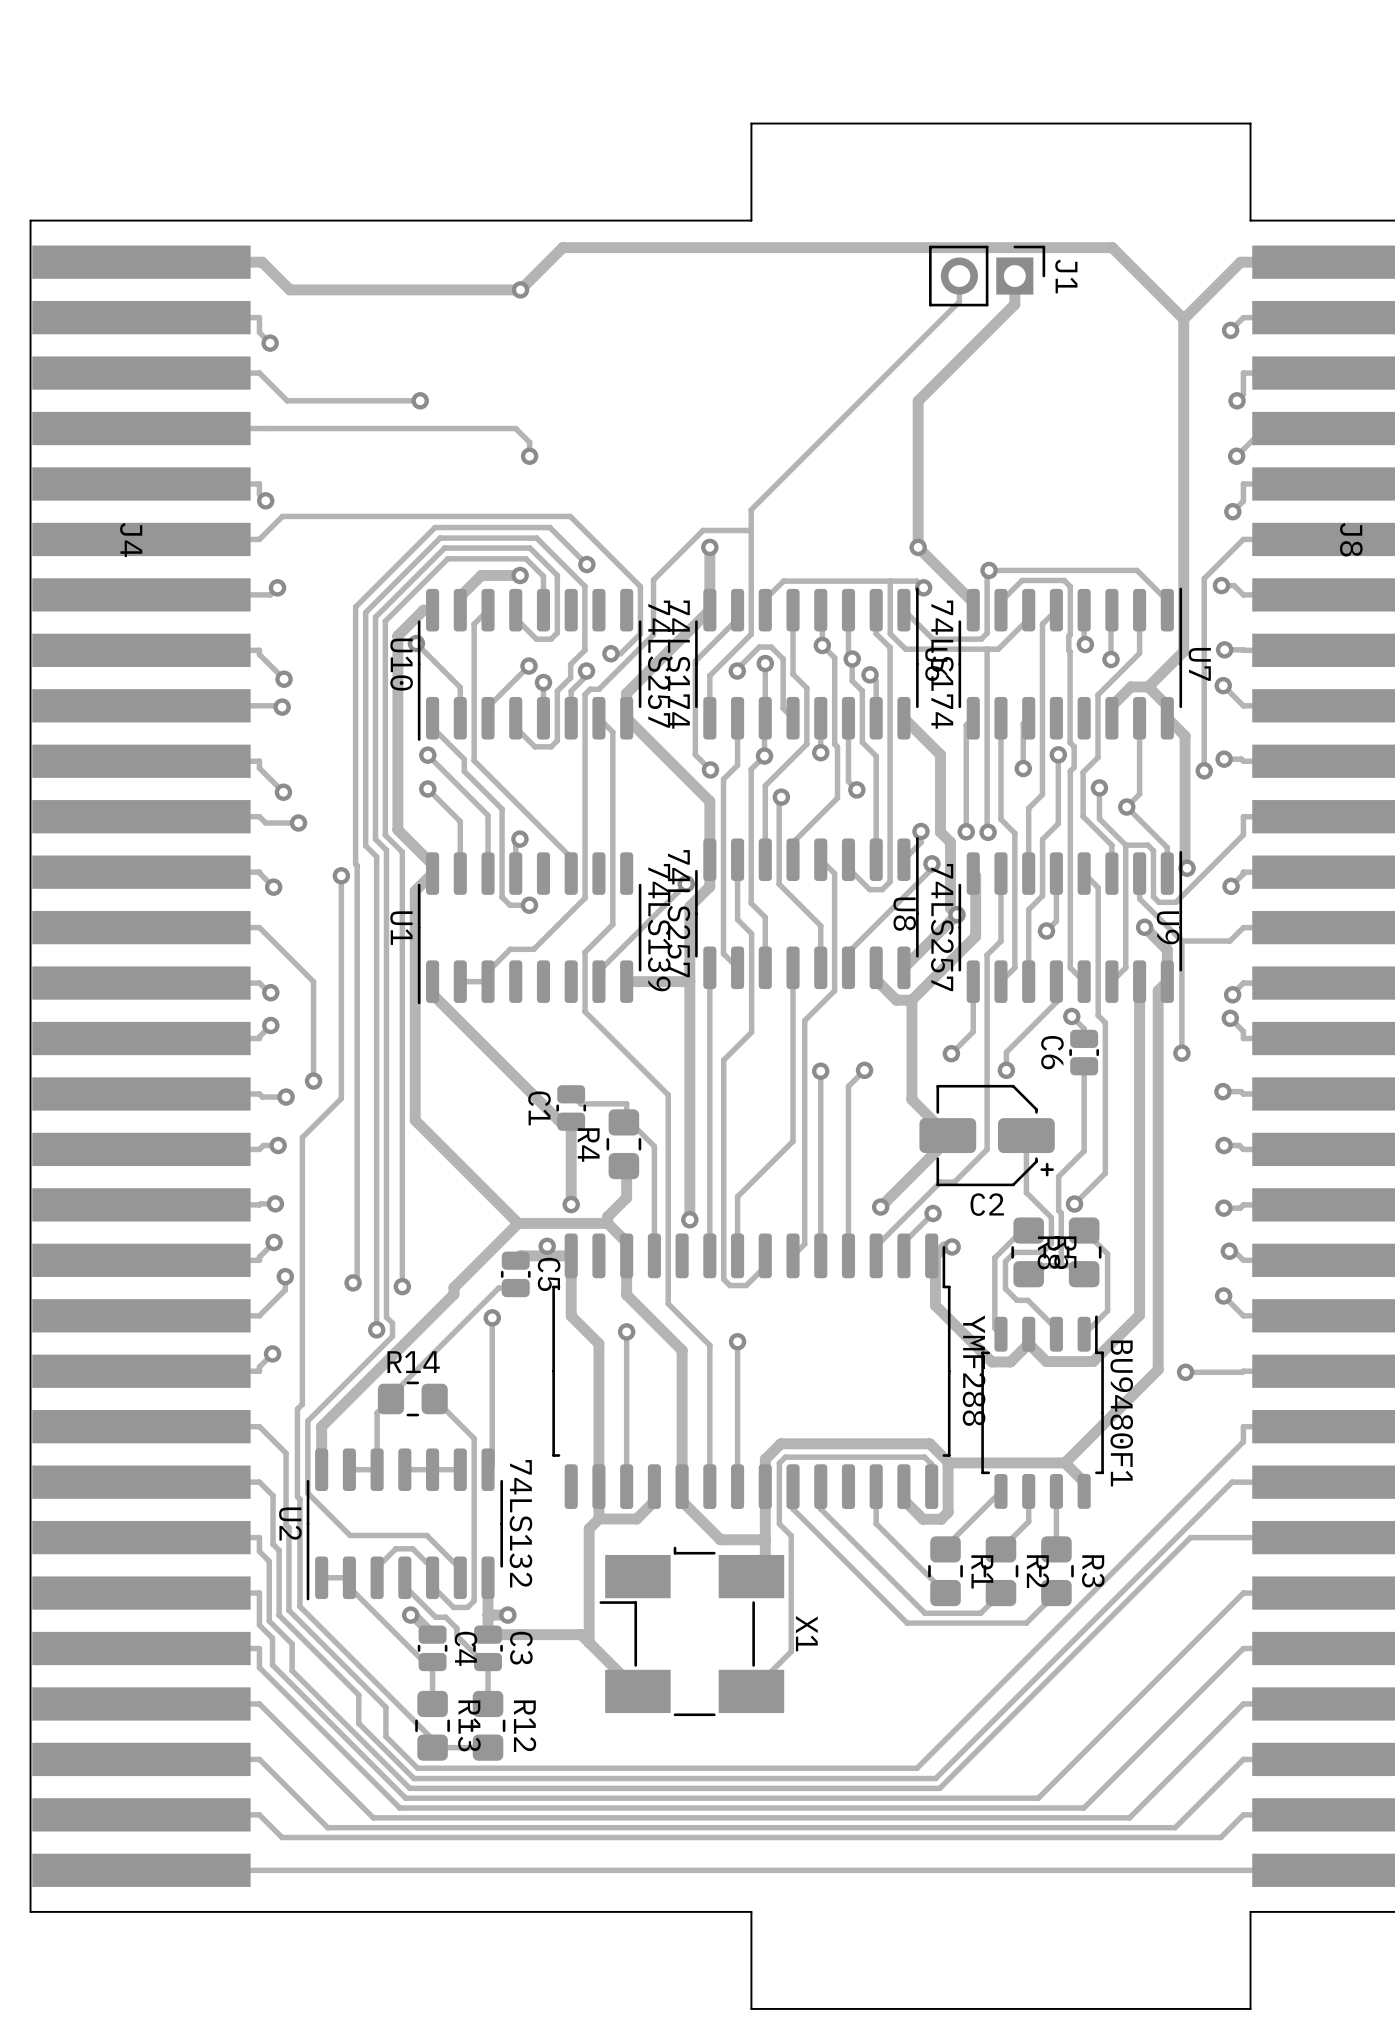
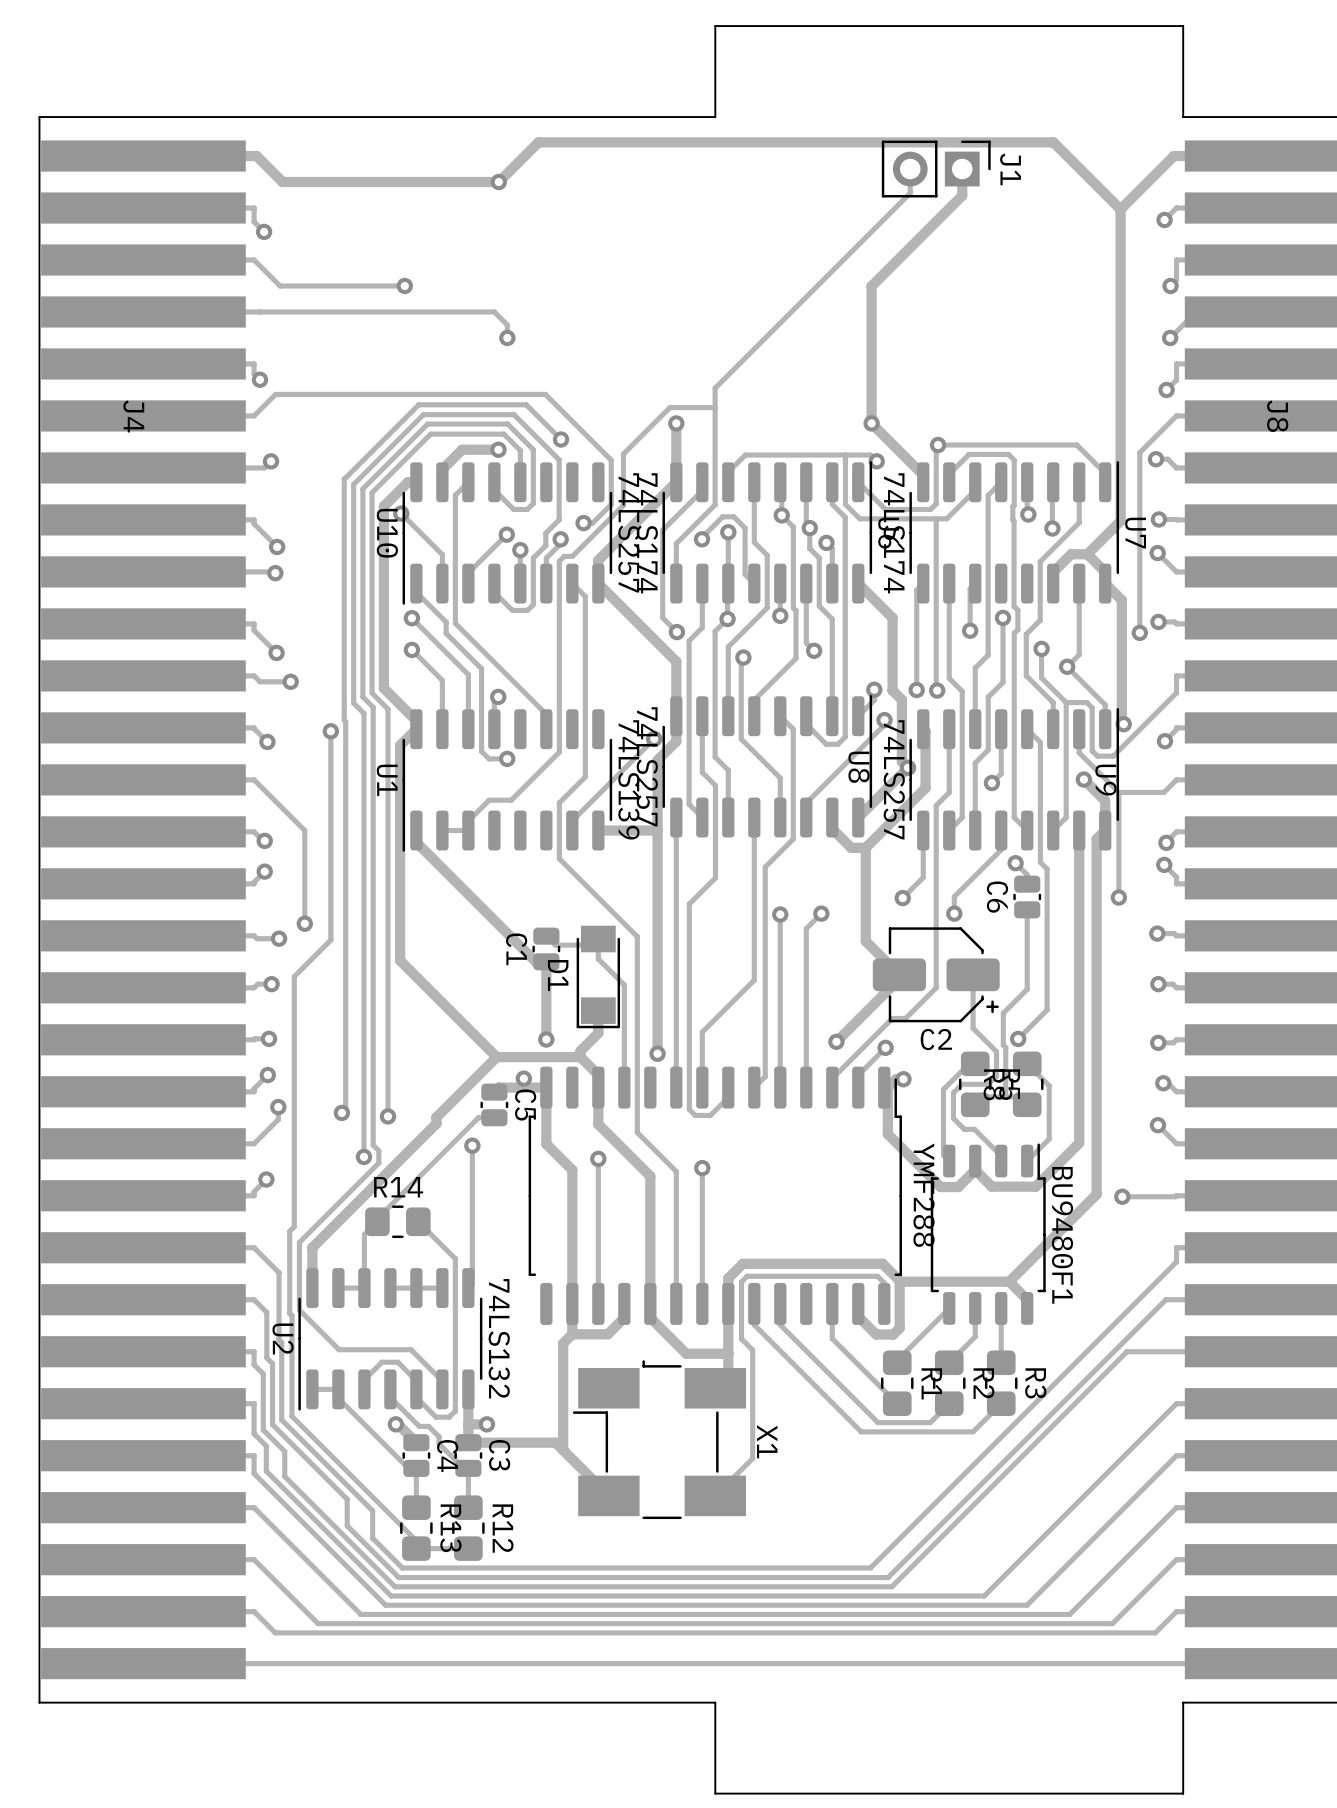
D1: none -> (598, 976)
R4: (623, 1144) -> none

